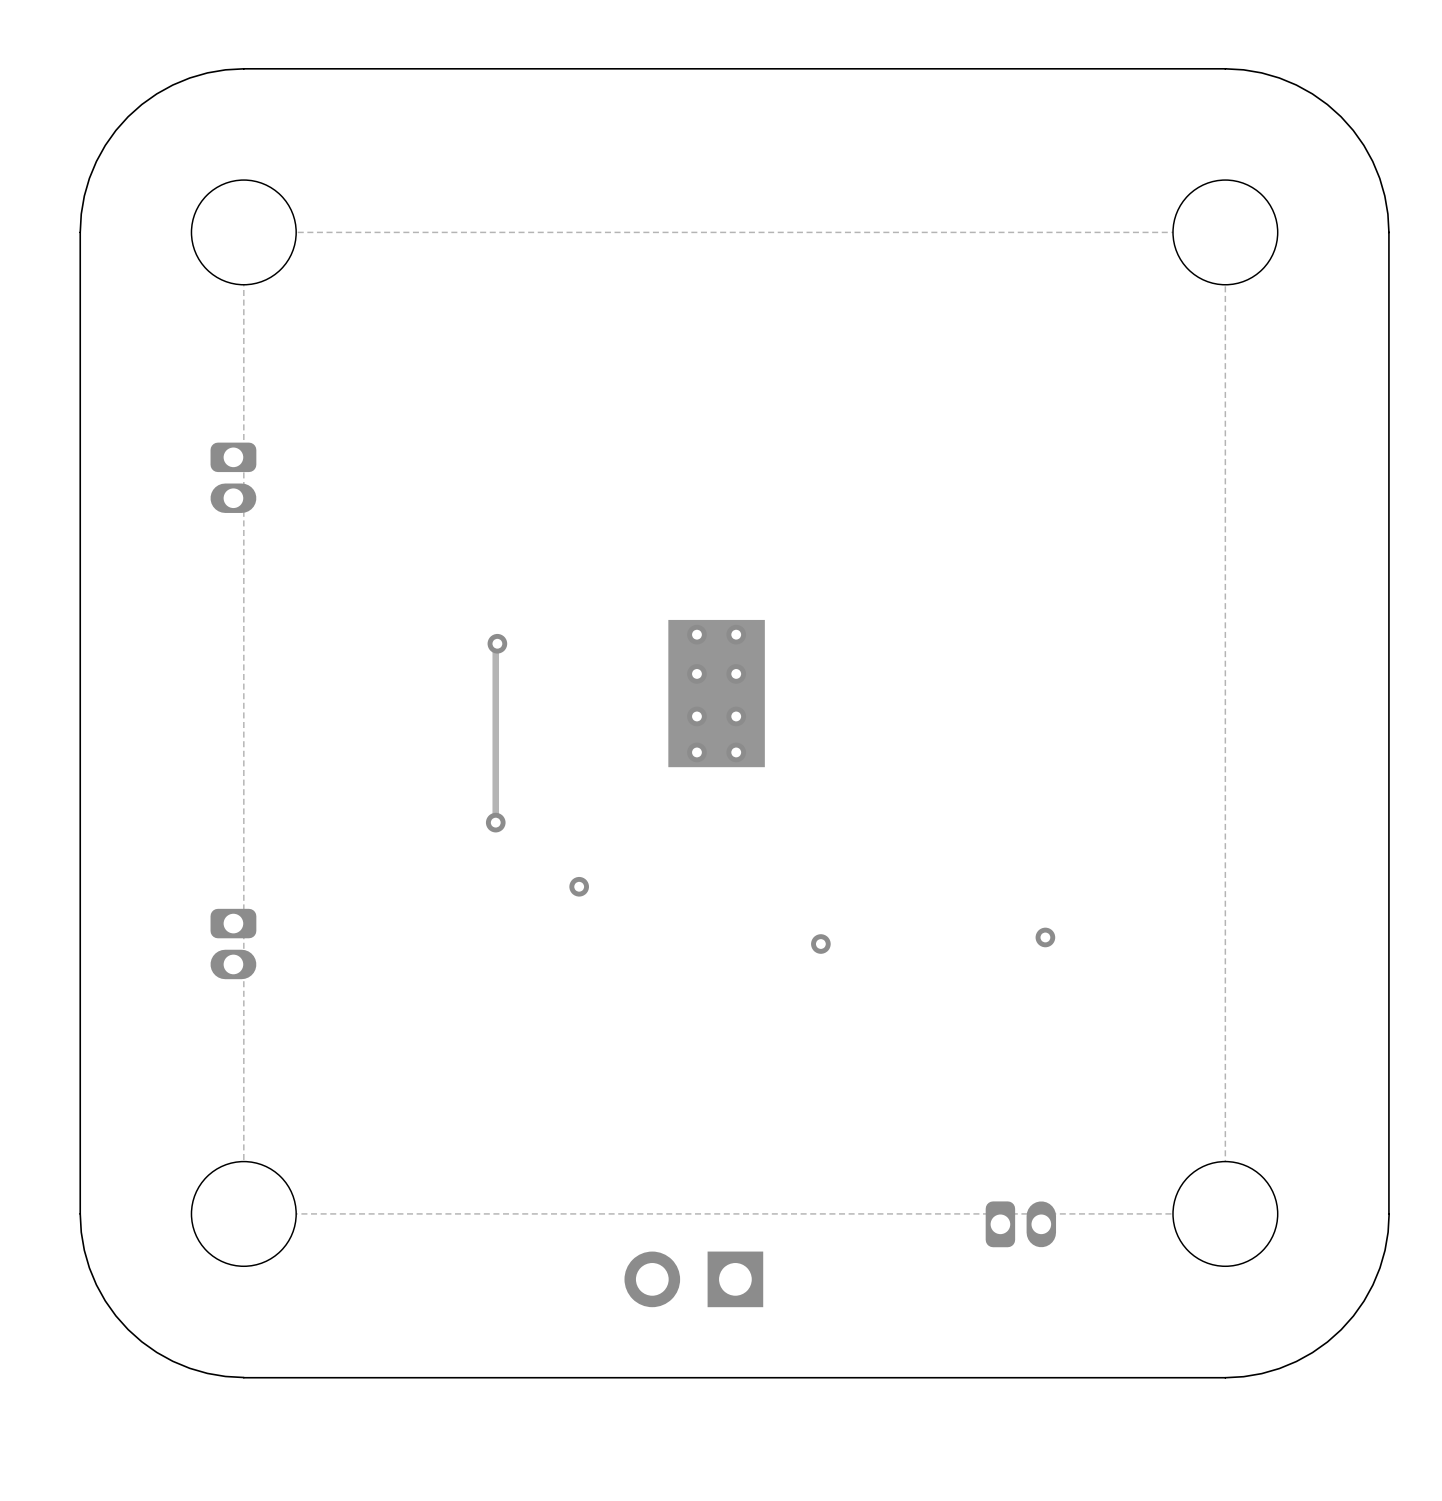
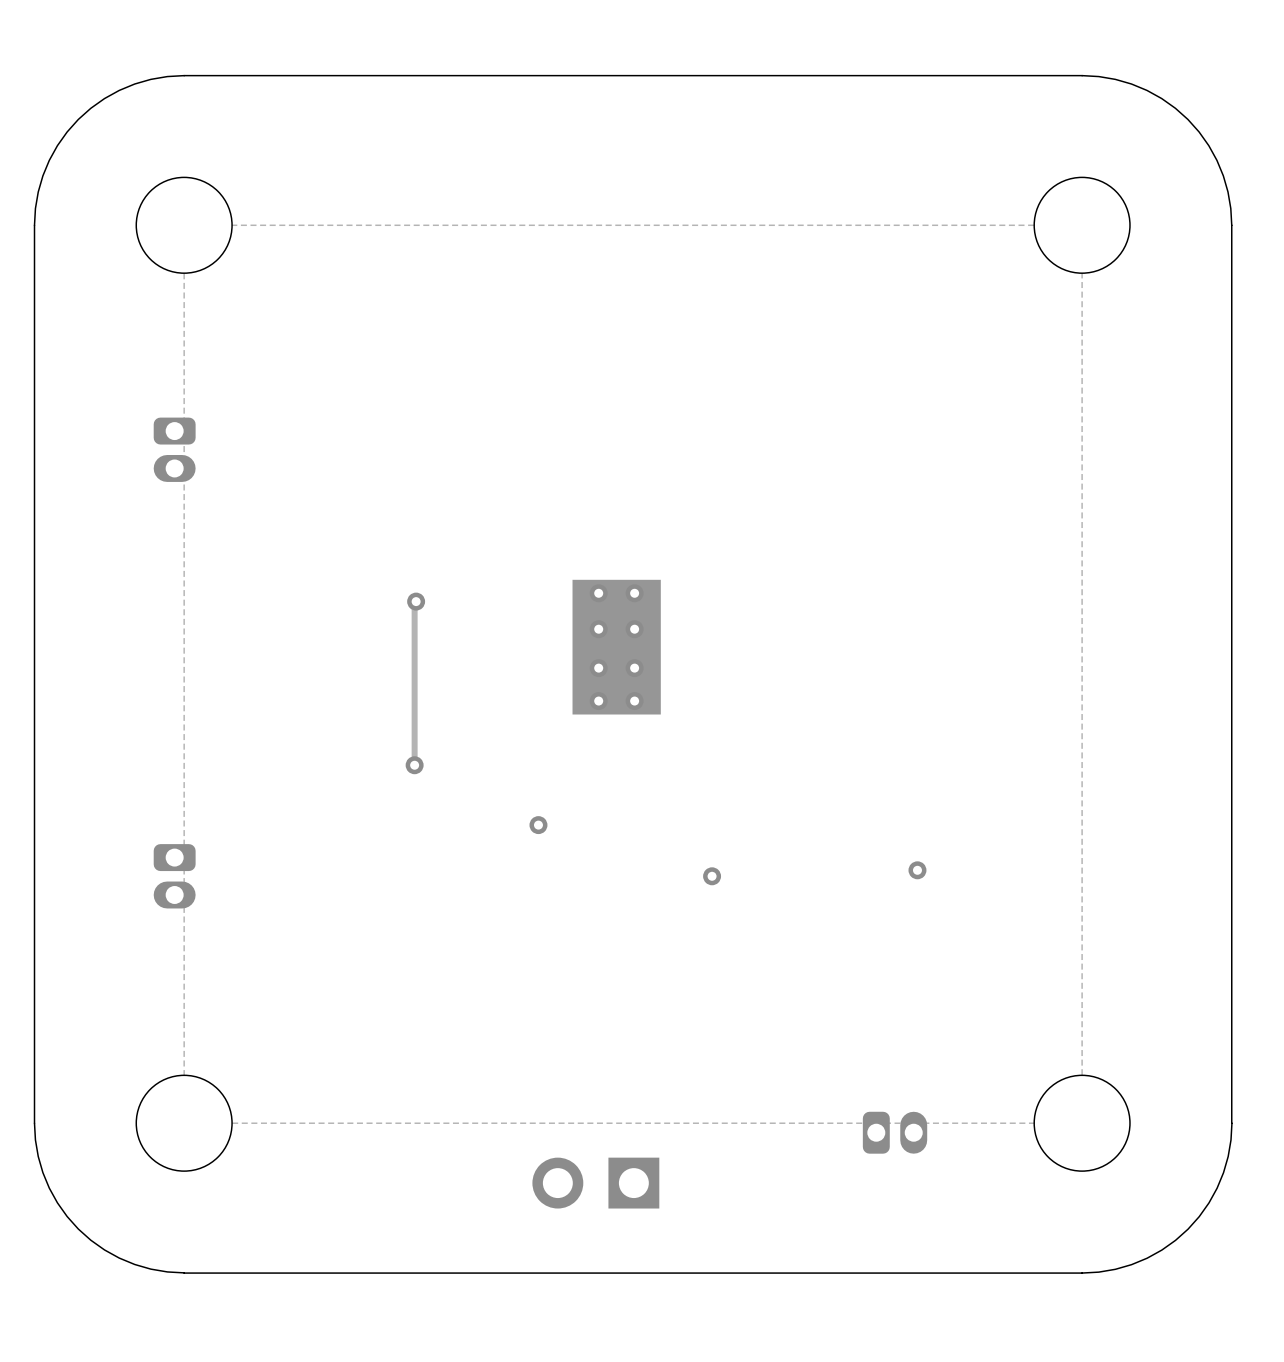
via position: (579, 886) -> (538, 825)

